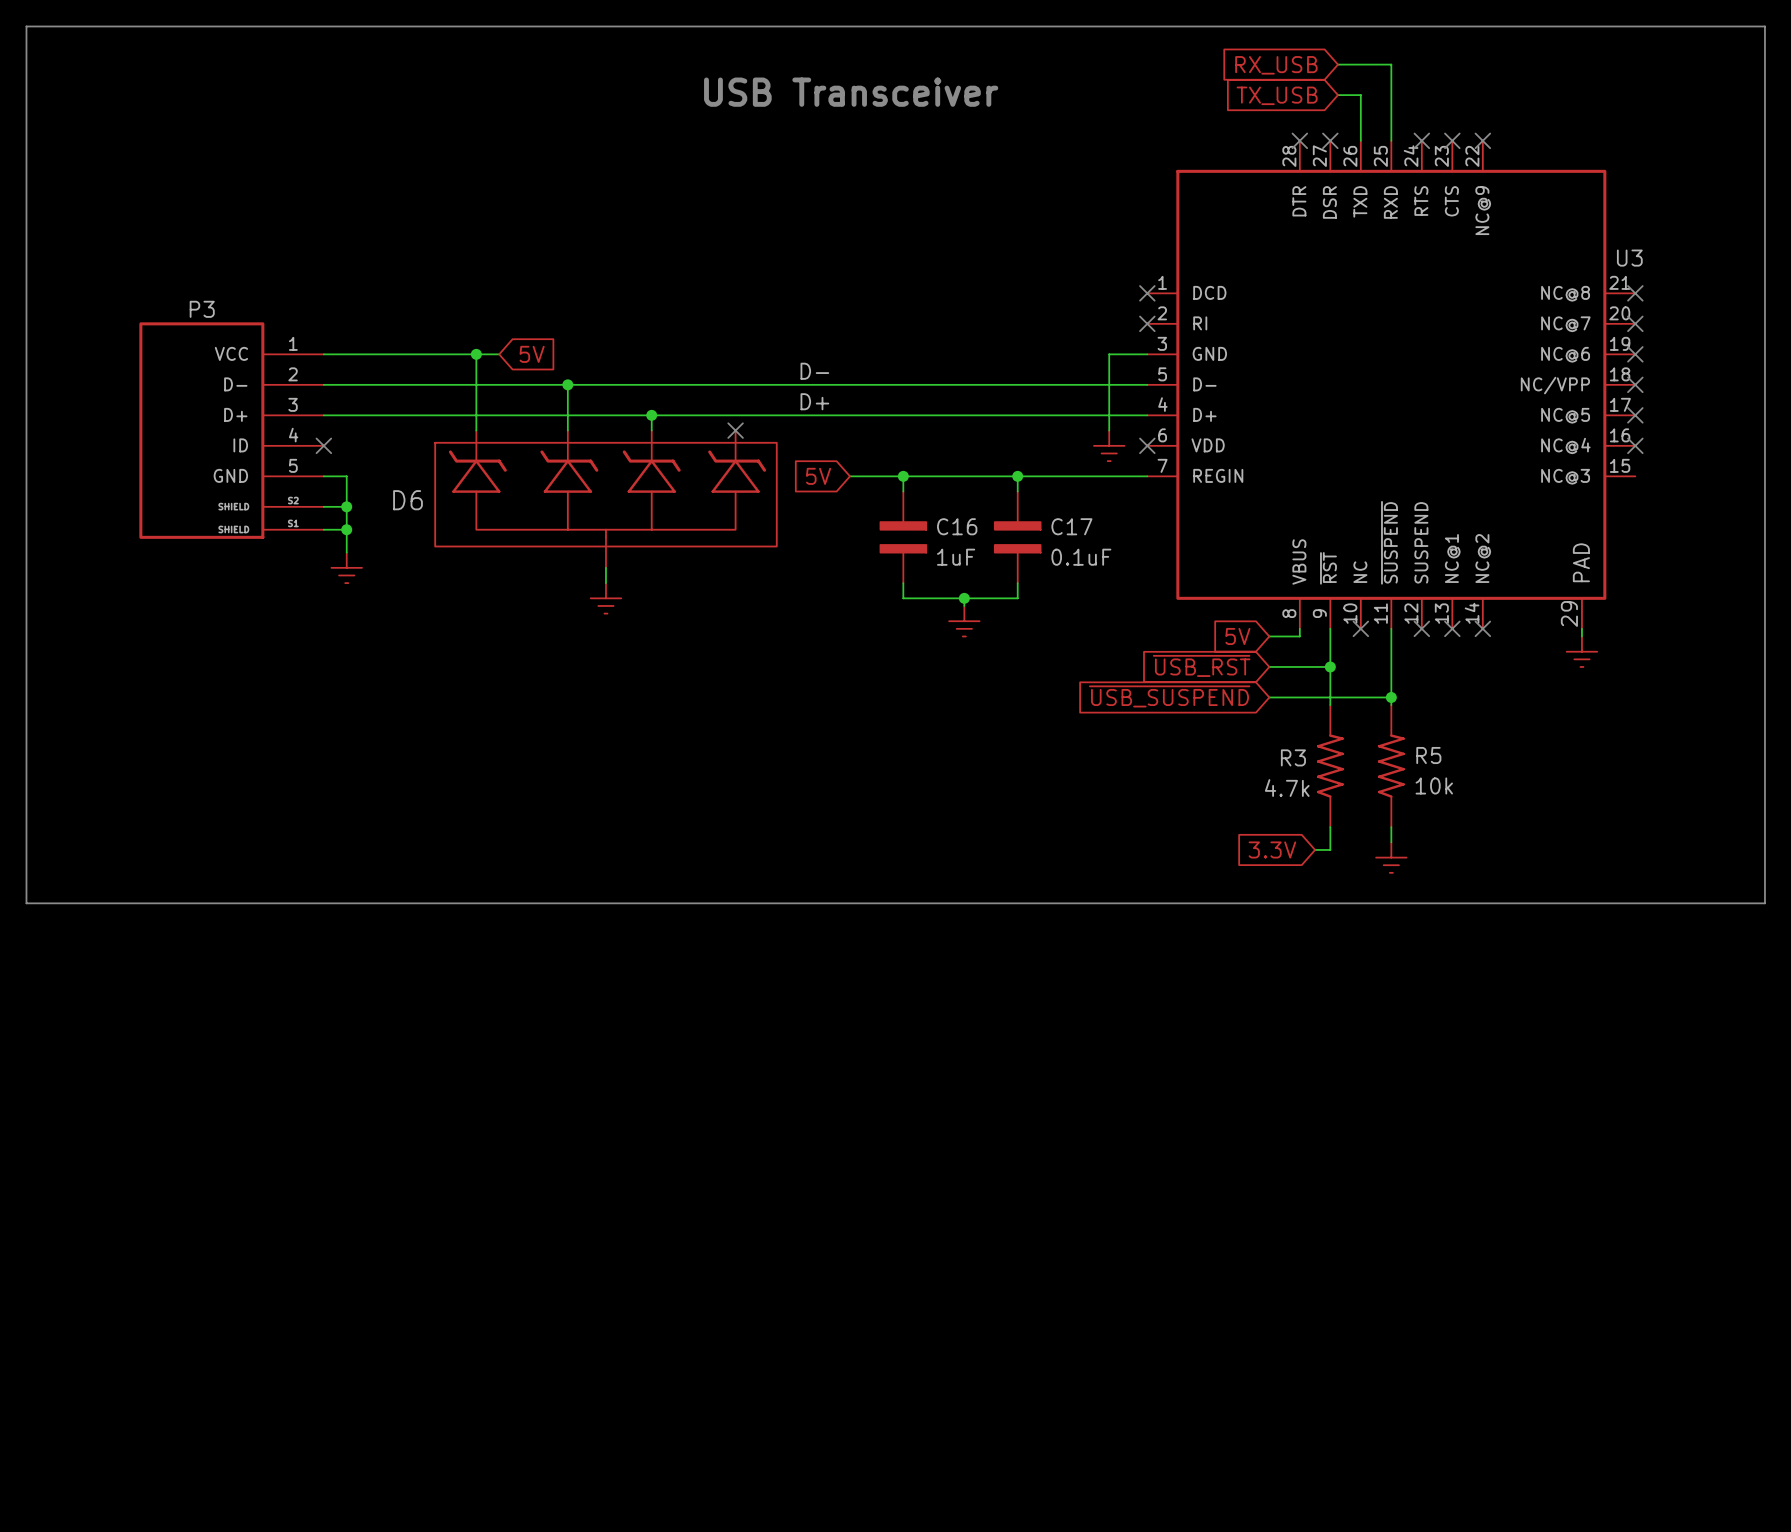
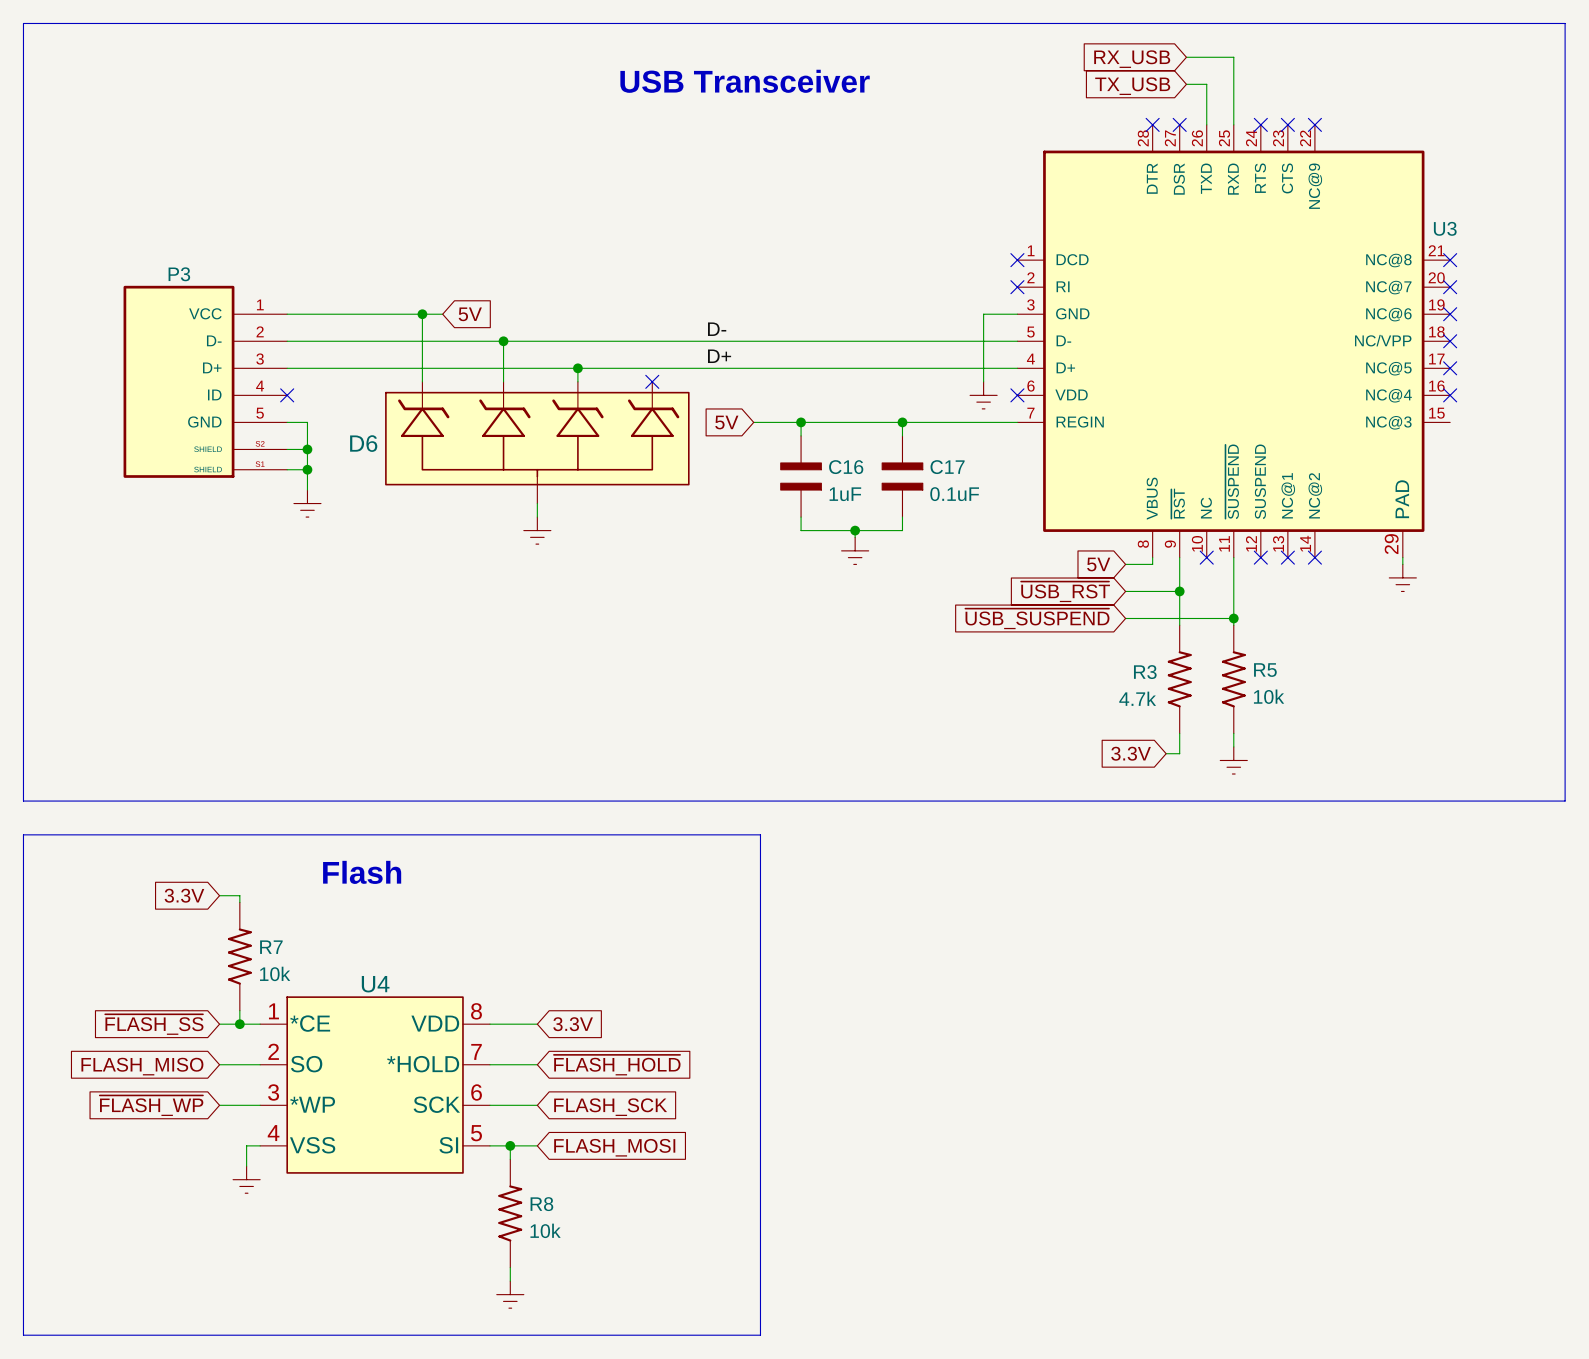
line: none -> (23, 834) (23, 1335) (760, 1335) (760, 834) (23, 834)
text: none -> Flash (362, 872)
global label: none -> 3.3V (184, 895)
wire: none -> (219, 895) (239, 895) (239, 902)
R7: none -> 10k (239, 956)
wire: none -> (239, 1010) (239, 1024)
global label: none -> ~{FLASH_SS} (154, 1024)
wire: none -> (219, 1024) (260, 1024)
junction: none -> (239, 1024)
wire: none -> (490, 1024) (537, 1024)
global label: none -> 3.3V (573, 1024)
global label: none -> ~{FLASH_HOLD} (617, 1065)
wire: none -> (219, 1064) (260, 1064)
wire: none -> (490, 1064) (537, 1064)
global label: none -> FLASH_MISO (142, 1066)
U4: none -> (375, 1085)
global label: none -> ~{FLASH_WP} (151, 1105)
wire: none -> (219, 1105) (260, 1105)
wire: none -> (490, 1105) (537, 1105)
global label: none -> FLASH_SCK (610, 1107)
wire: none -> (260, 1145) (246, 1145) (246, 1166)
wire: none -> (490, 1145) (537, 1145)
wire: none -> (510, 1145) (510, 1159)
junction: none -> (510, 1145)
global label: none -> FLASH_MOSI (614, 1147)
power symbol: none -> (246, 1179)
R8: none -> 10k (510, 1213)
wire: none -> (510, 1267) (510, 1281)
power symbol: none -> (510, 1294)

